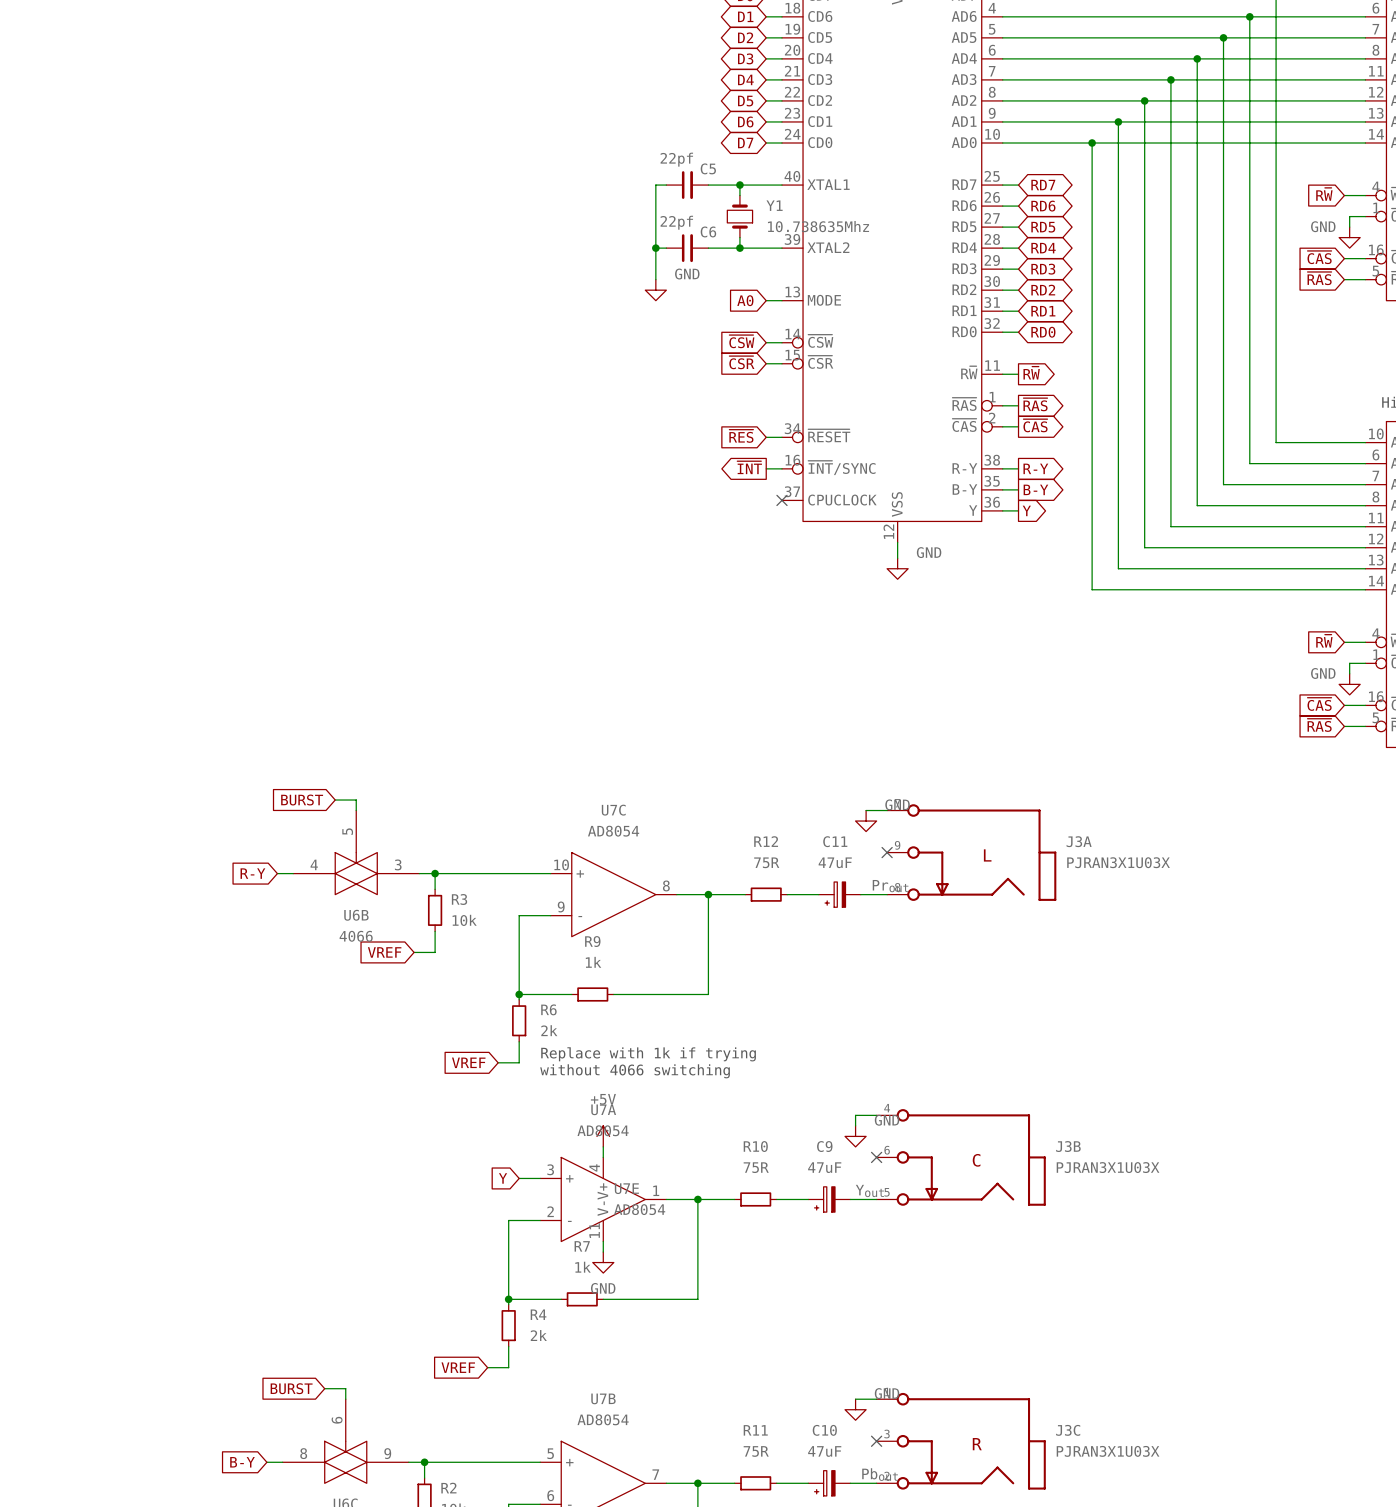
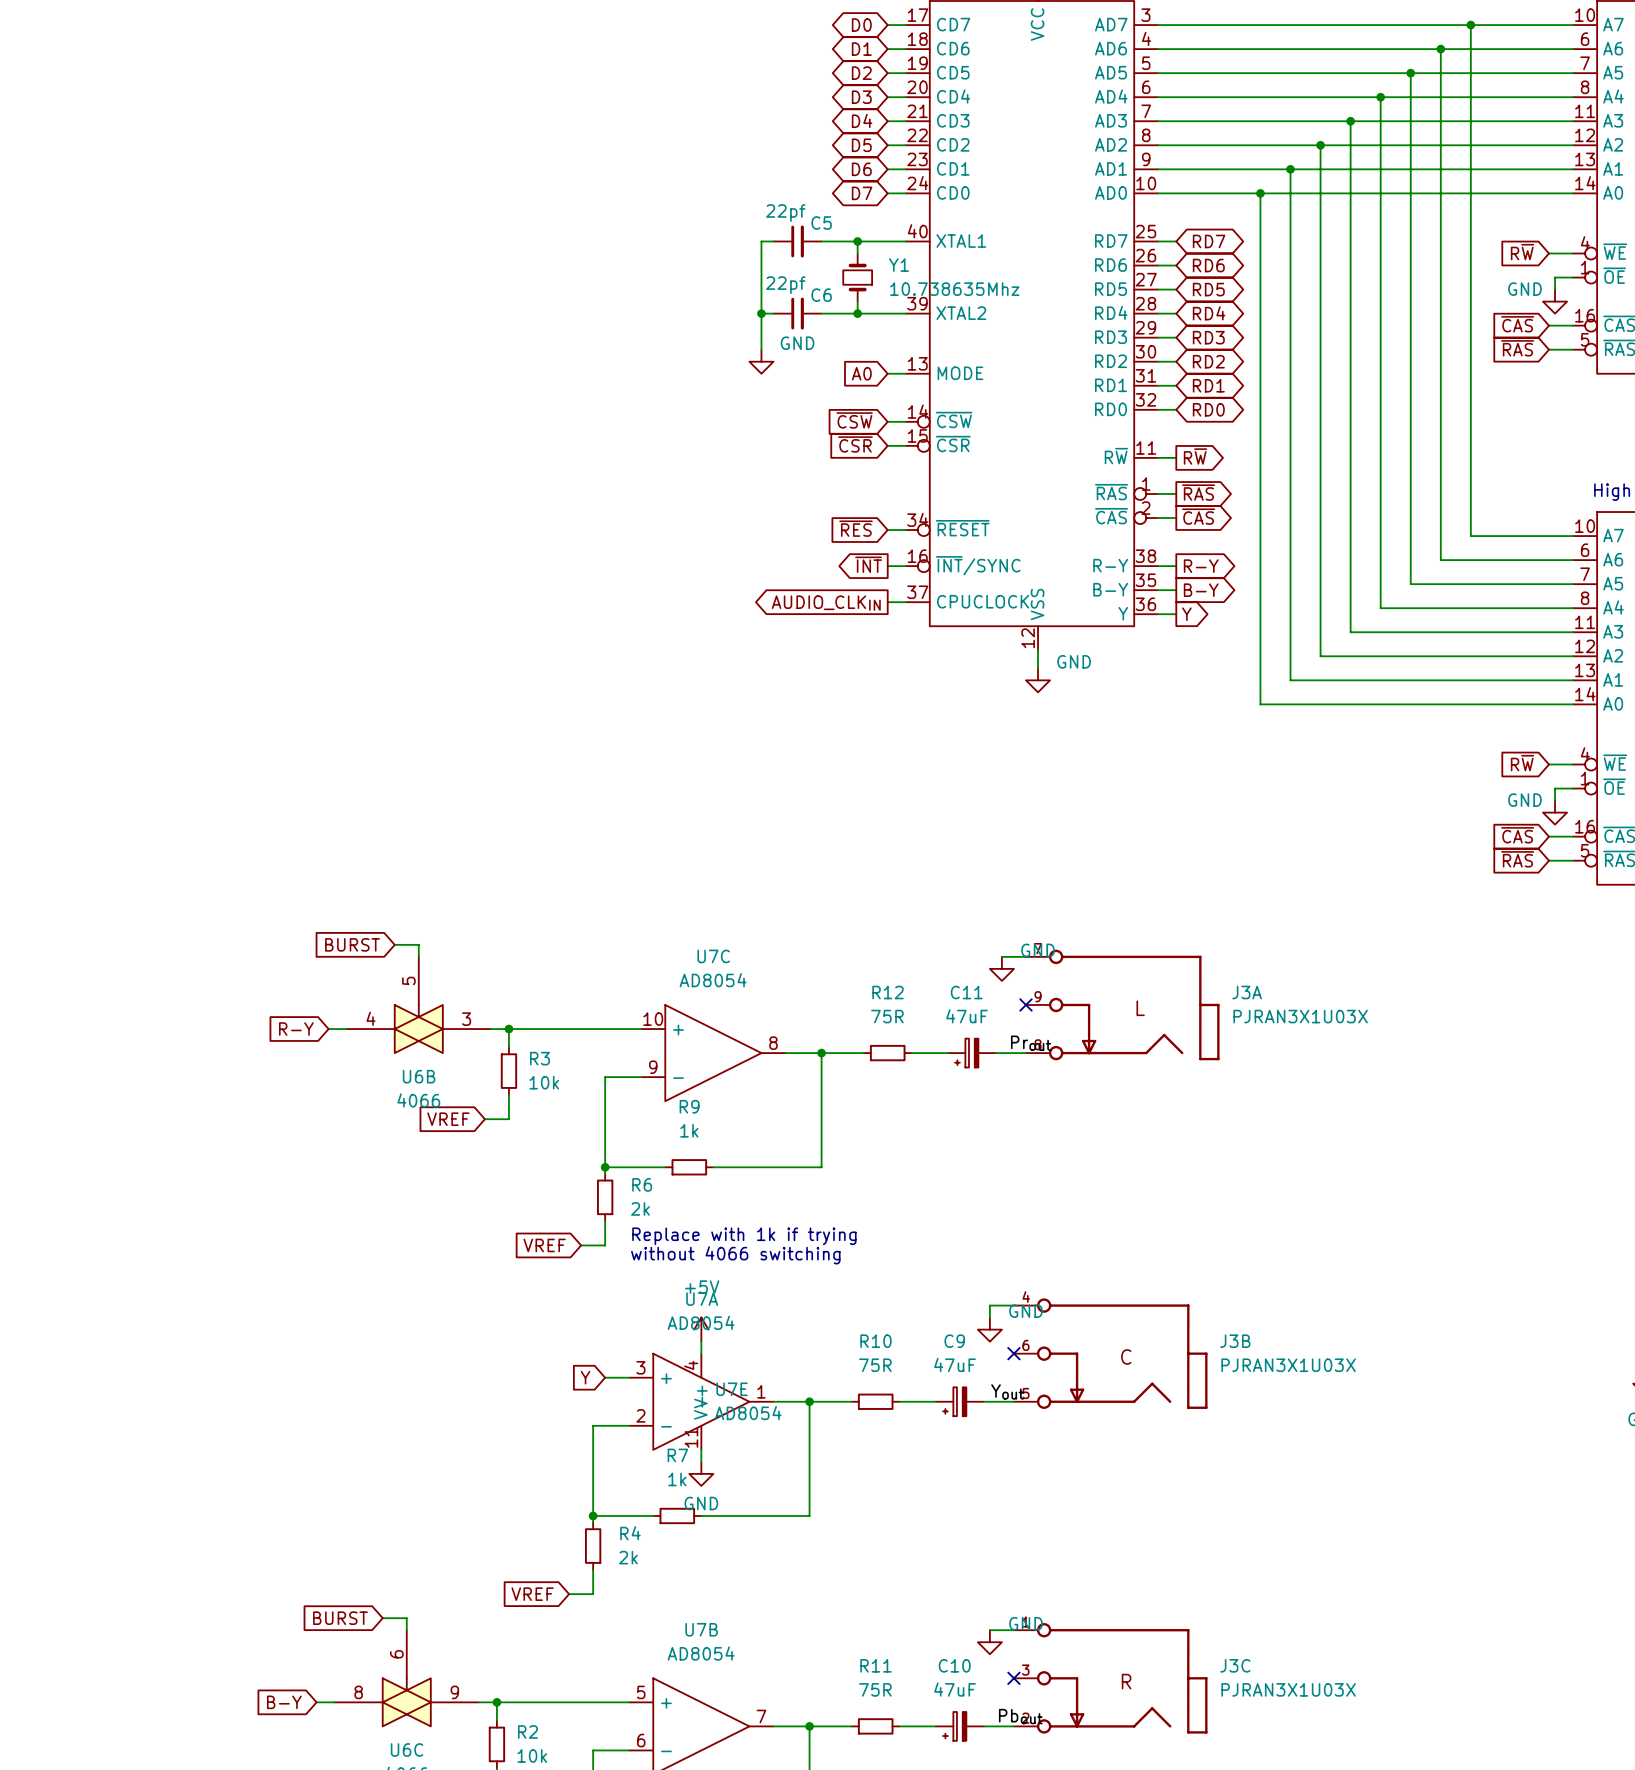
wire: none -> (887, 602) (905, 602)
no-connect mark: (782, 500) -> none
global label: none -> AUDIO_CLKIN (826, 603)

